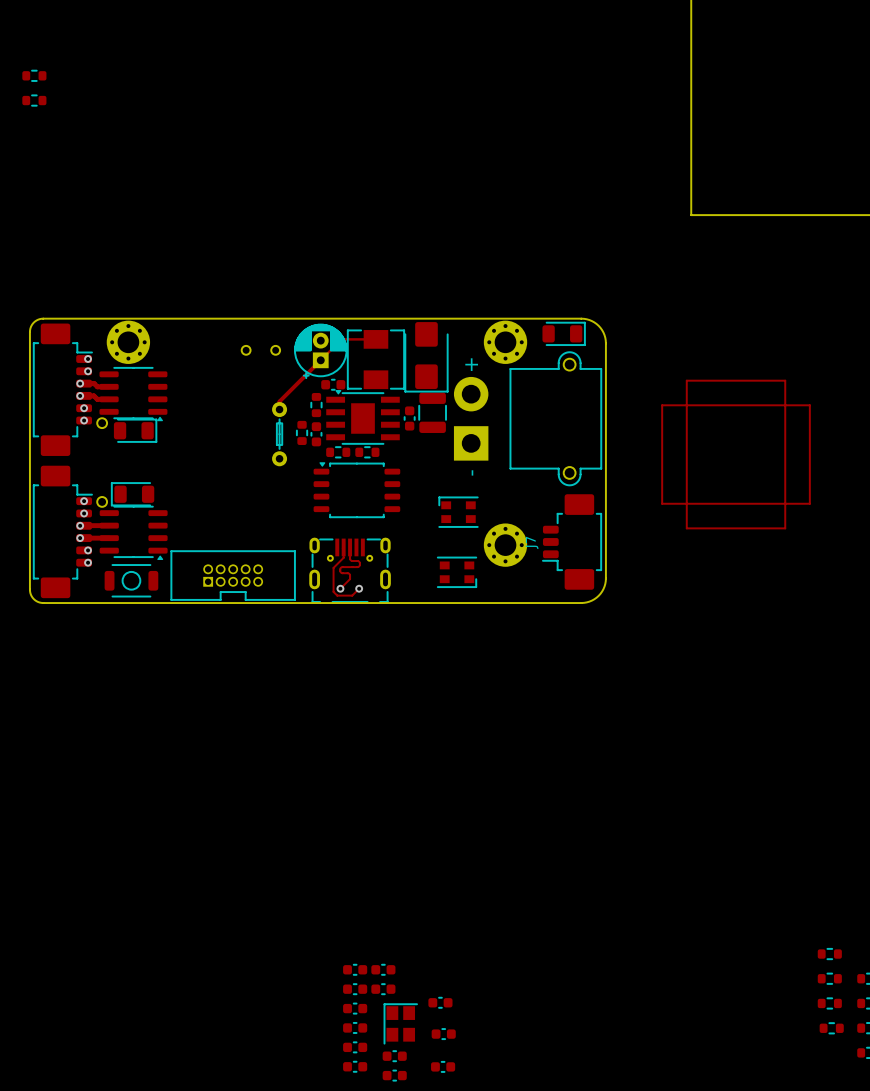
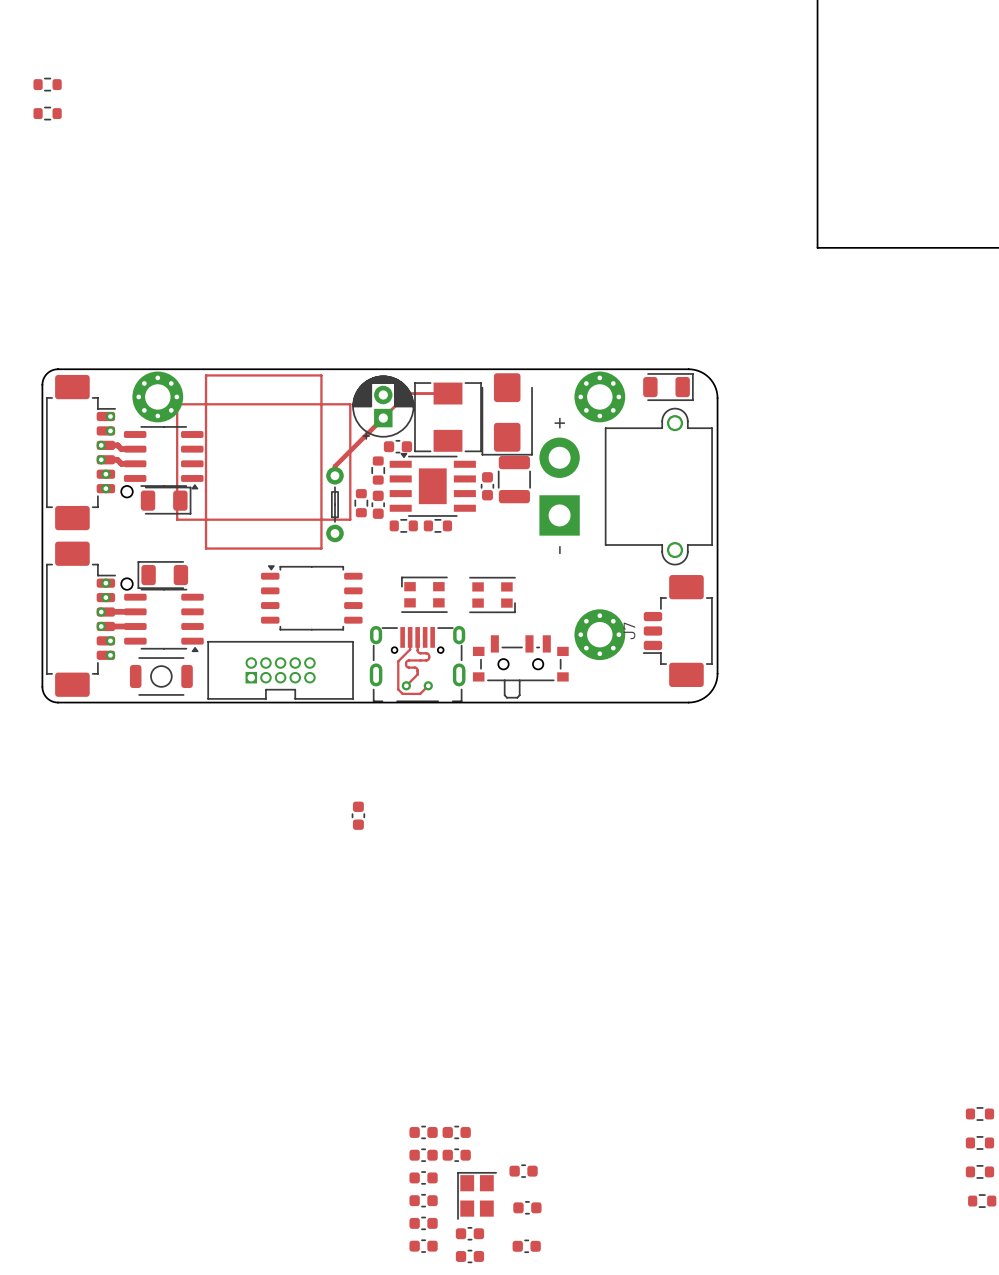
track: none -> (206, 375) (321, 375) (321, 548) (206, 548) (206, 375)
track: none -> (177, 404) (350, 404) (350, 519) (177, 519) (177, 404)
part: (260, 350) -> none
track: (686, 380) (785, 380) (785, 528) (686, 528) (686, 380) -> none
track: (662, 405) (809, 405) (809, 503) (662, 503) (662, 405) -> none
part position: (356, 490) -> (311, 597)
part: none -> (424, 594)
part: none -> (492, 595)
part: (458, 512) -> none
part: none -> (520, 666)
part: (457, 572) -> none
part: none -> (358, 815)

